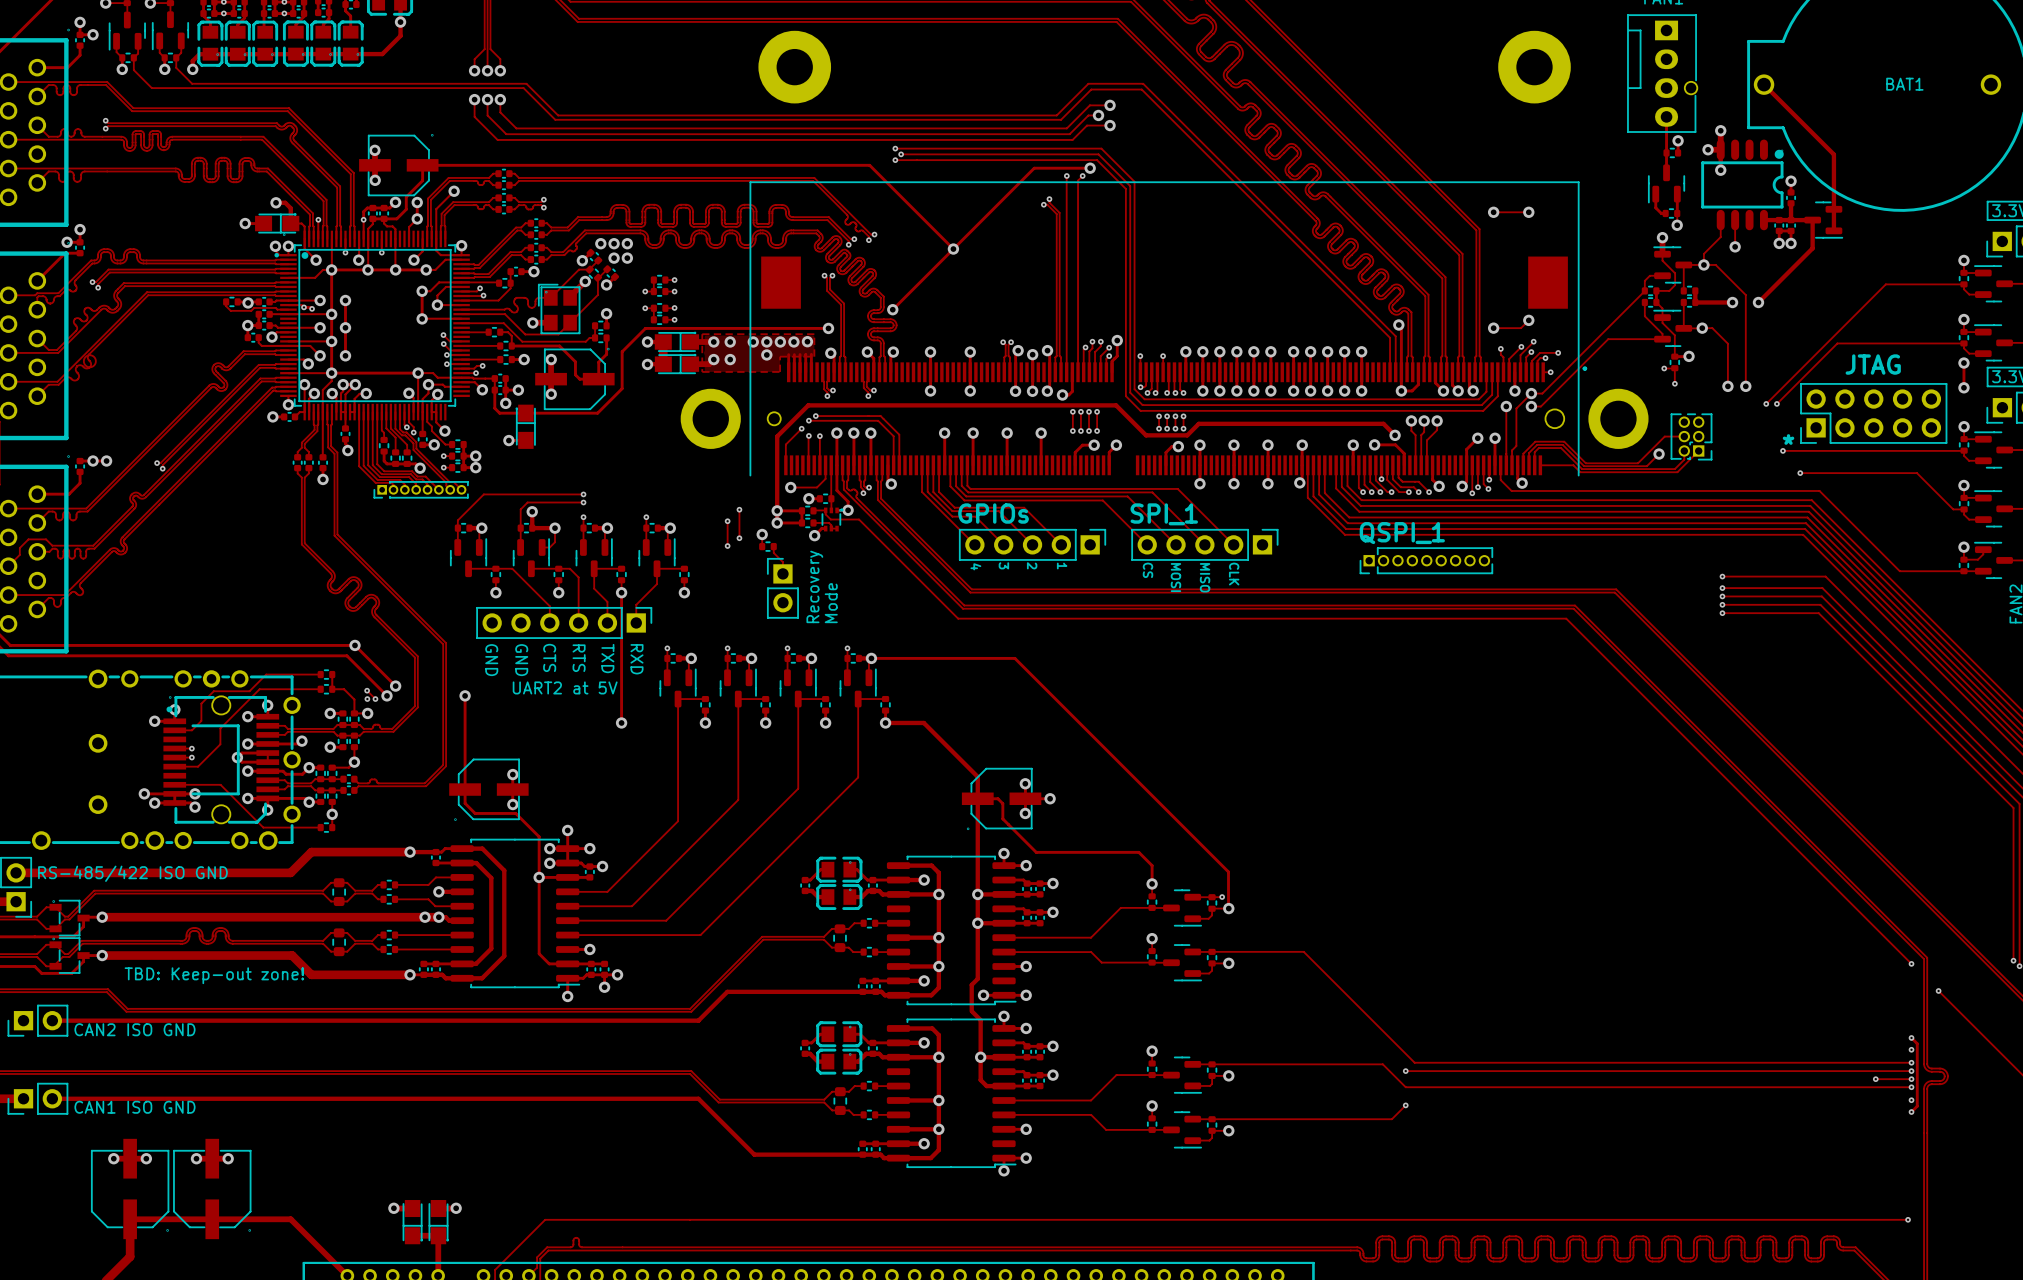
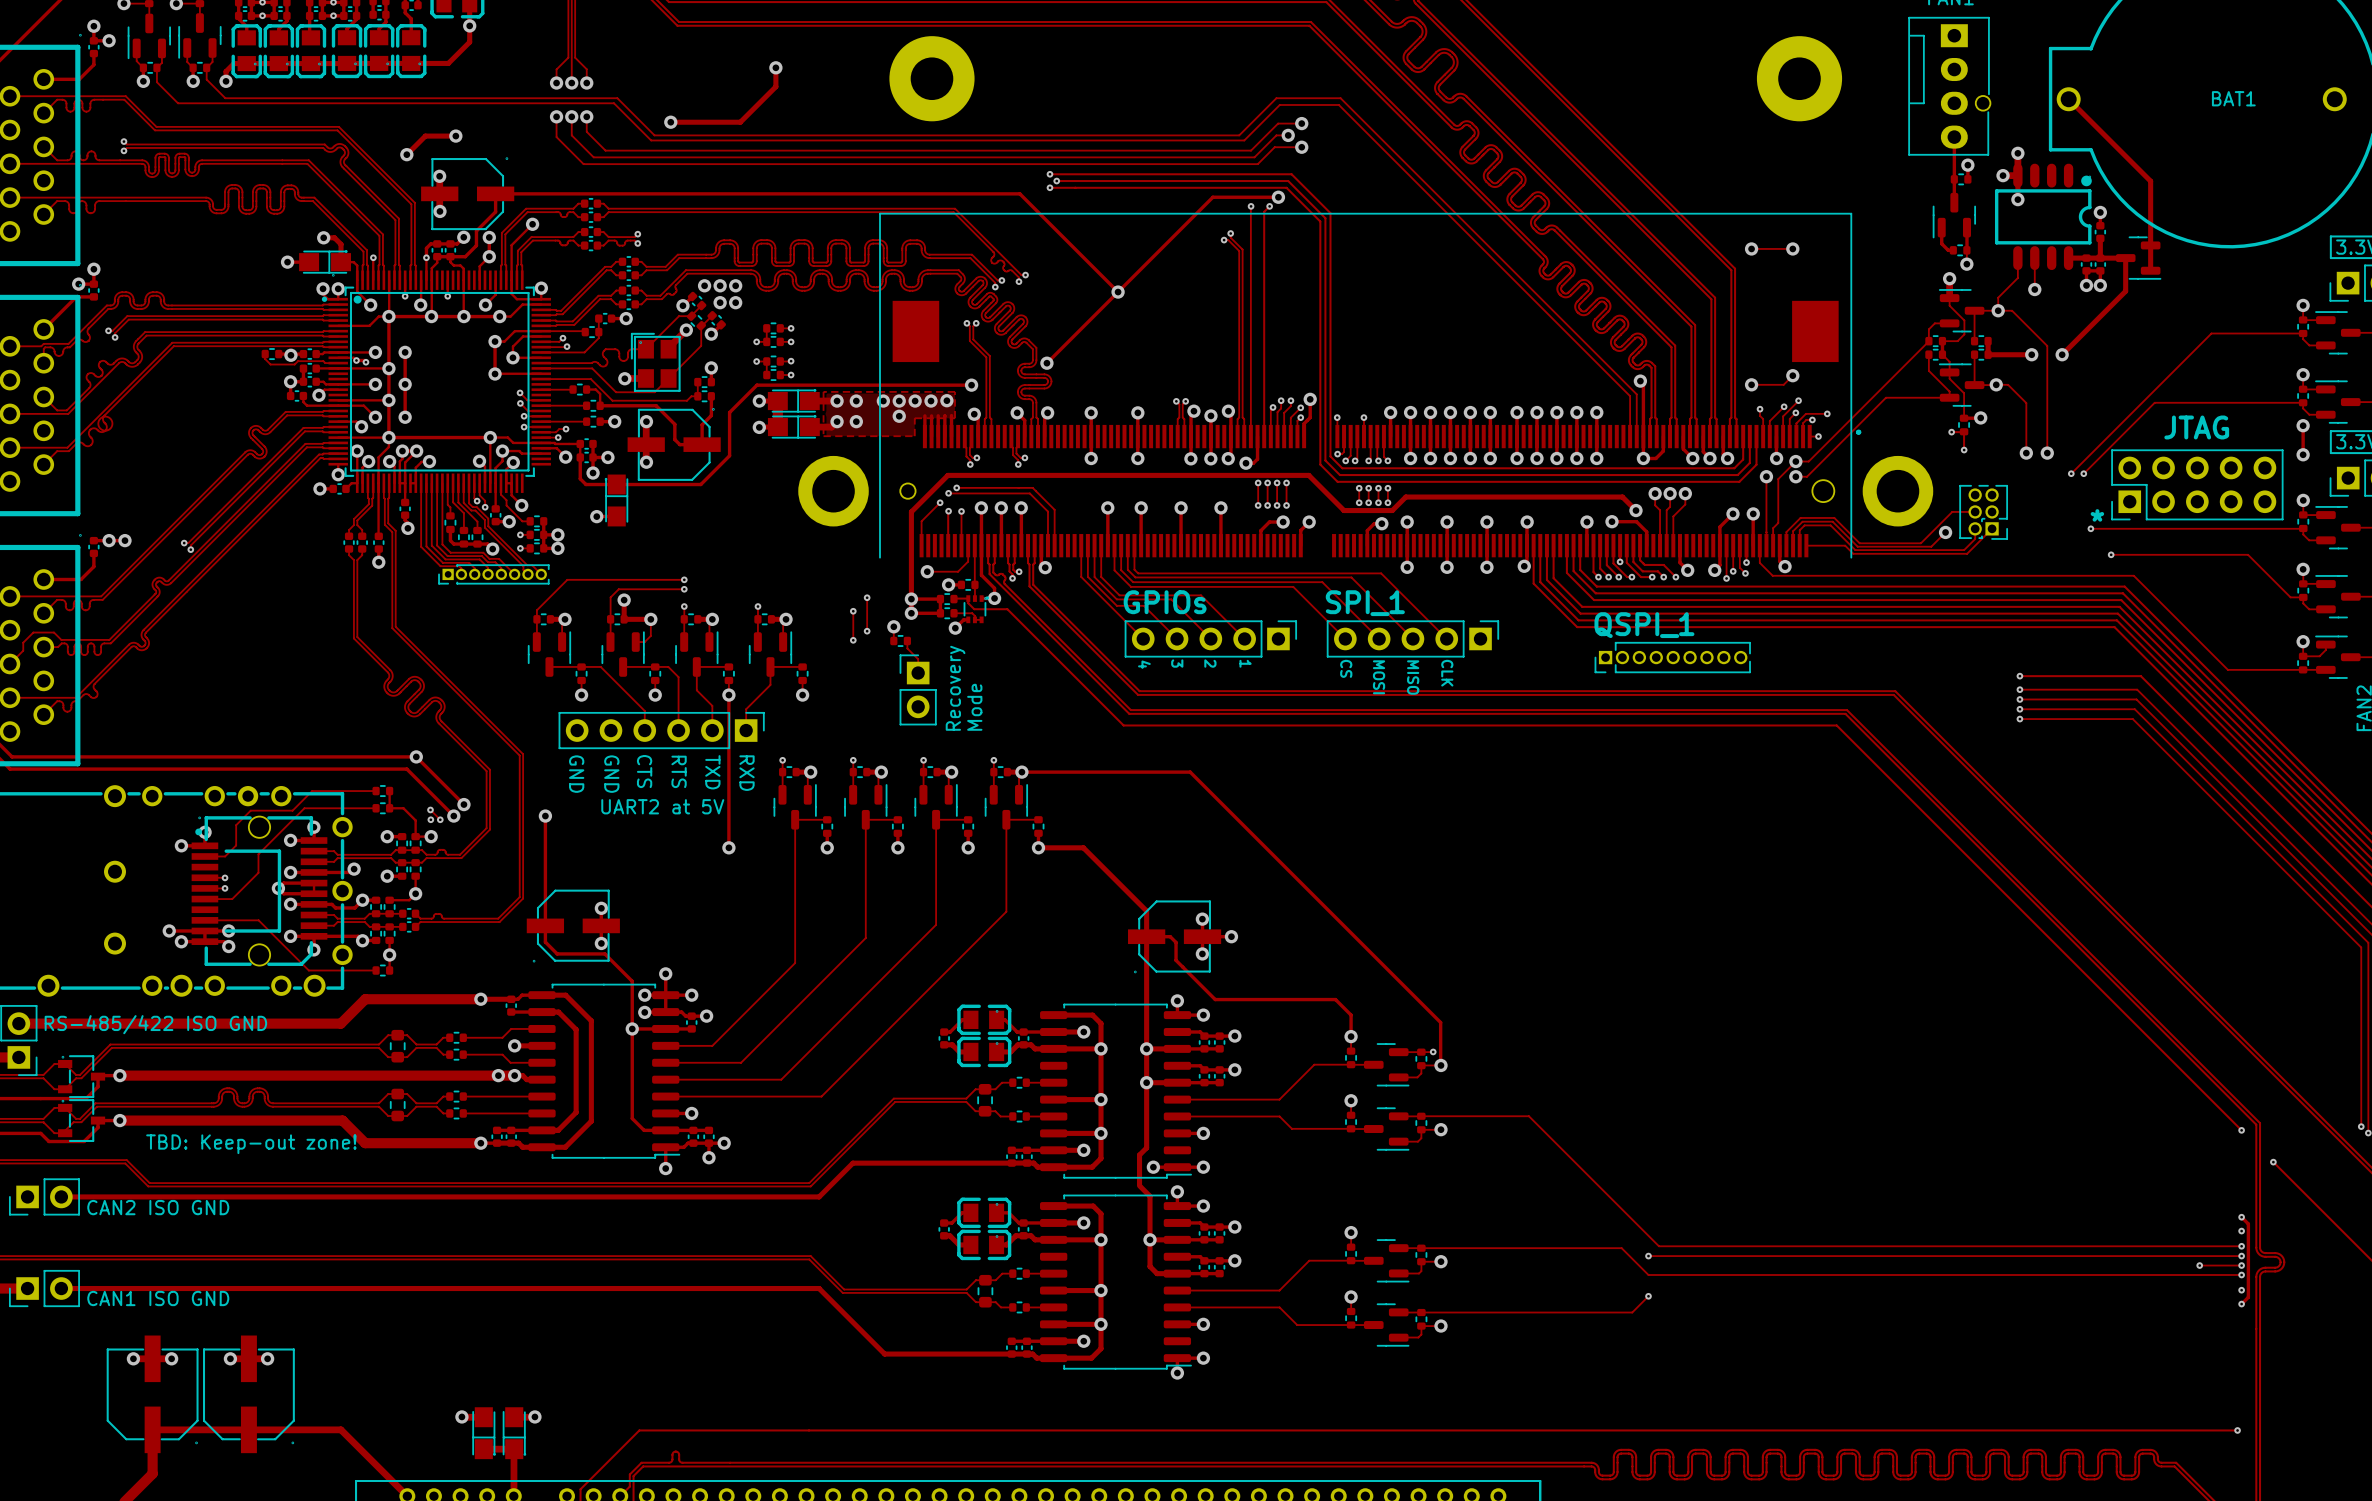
track: none -> (775, 67) (775, 86) (740, 122) (670, 122)
via: none -> (775, 67)
via: none -> (670, 122)
track: none -> (455, 136) (425, 136) (406, 154)
via: none -> (455, 136)
via: none -> (406, 154)

